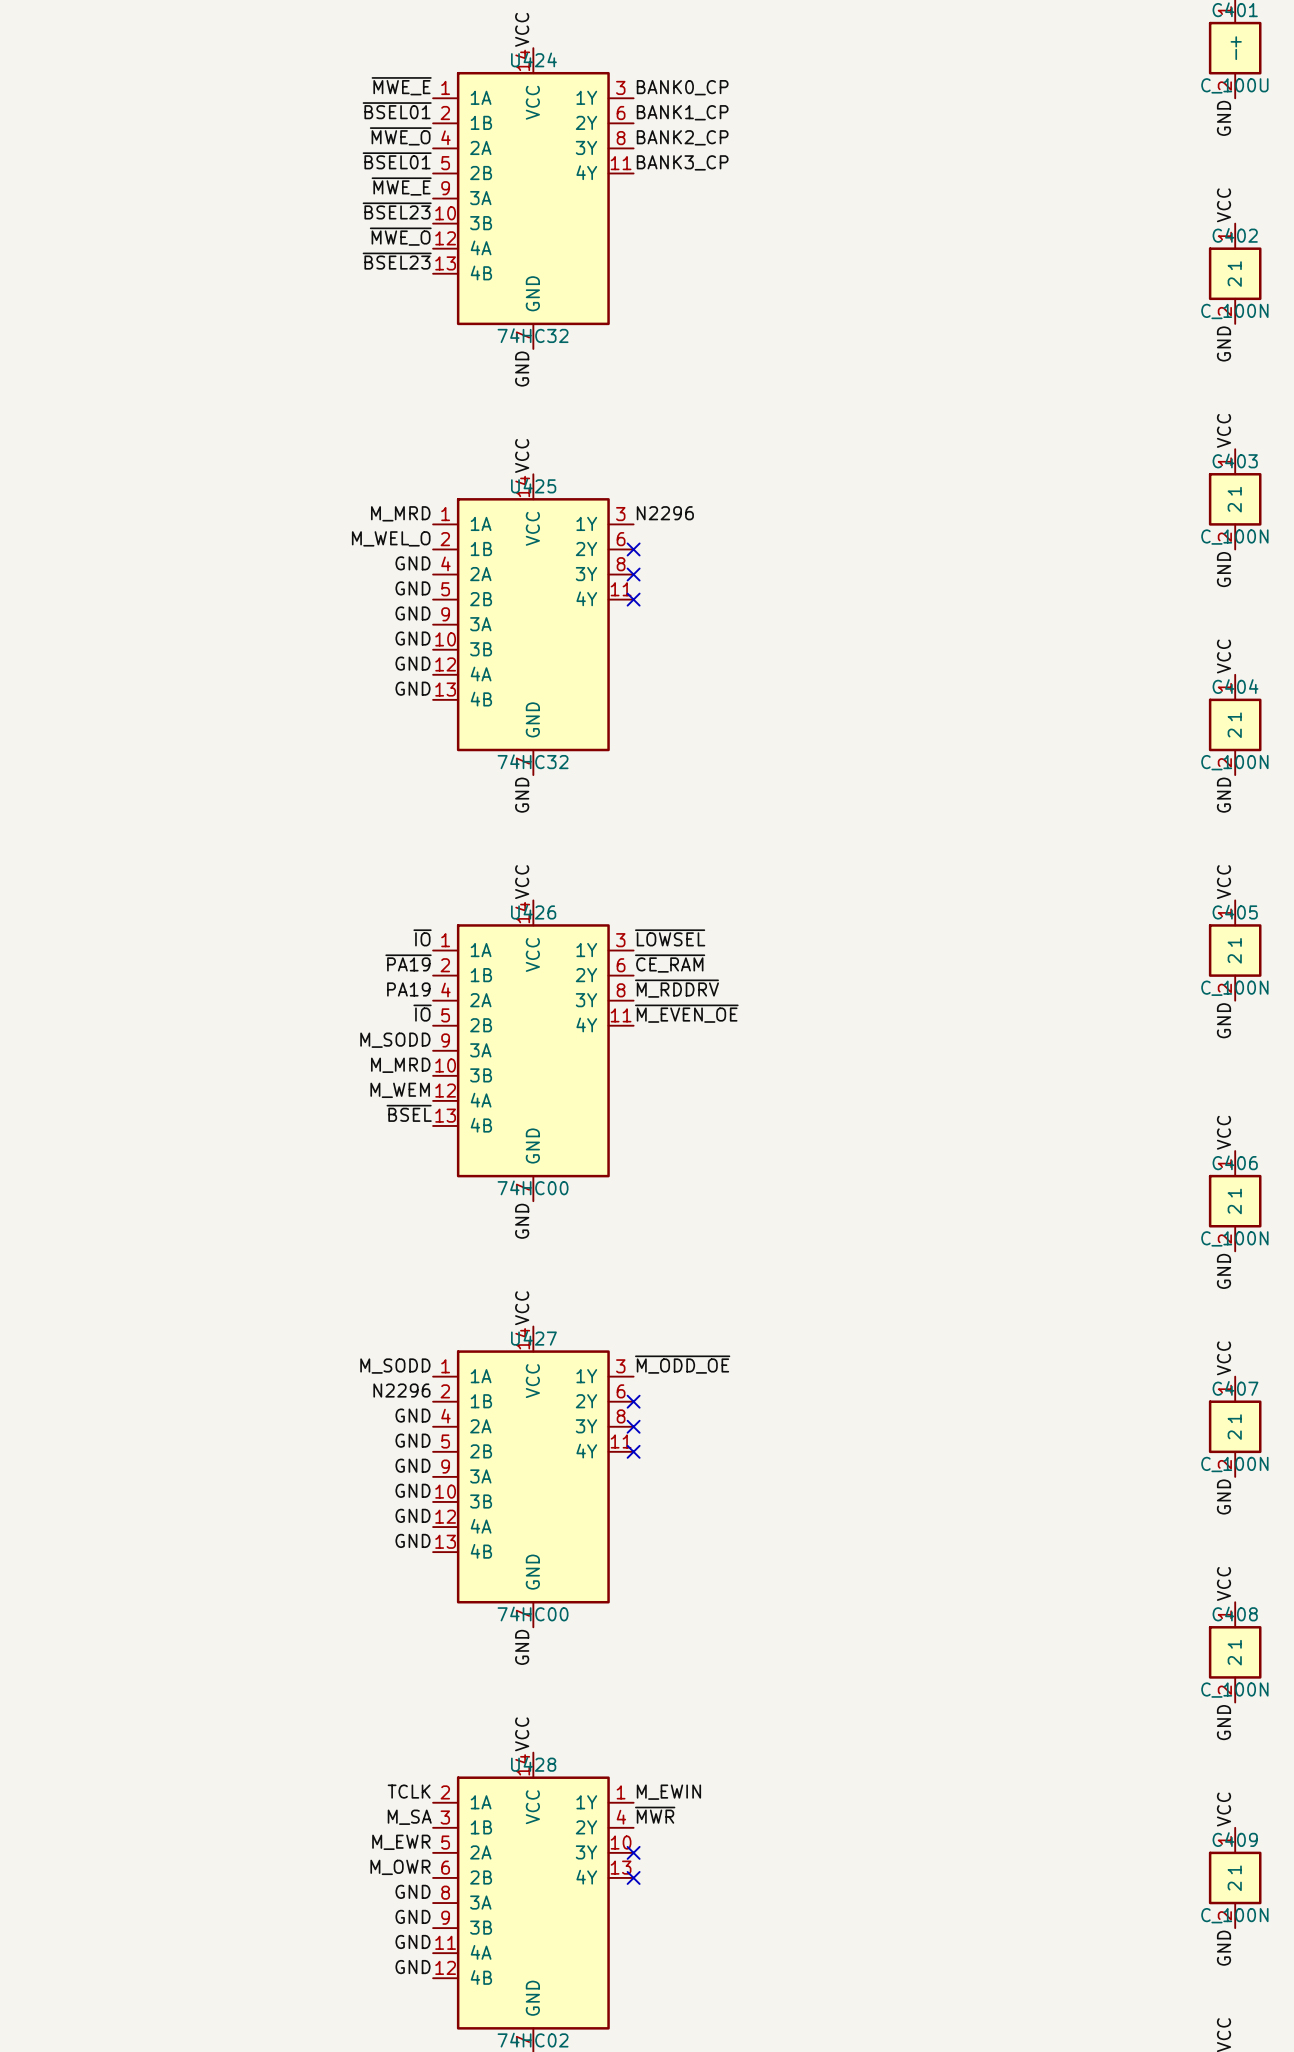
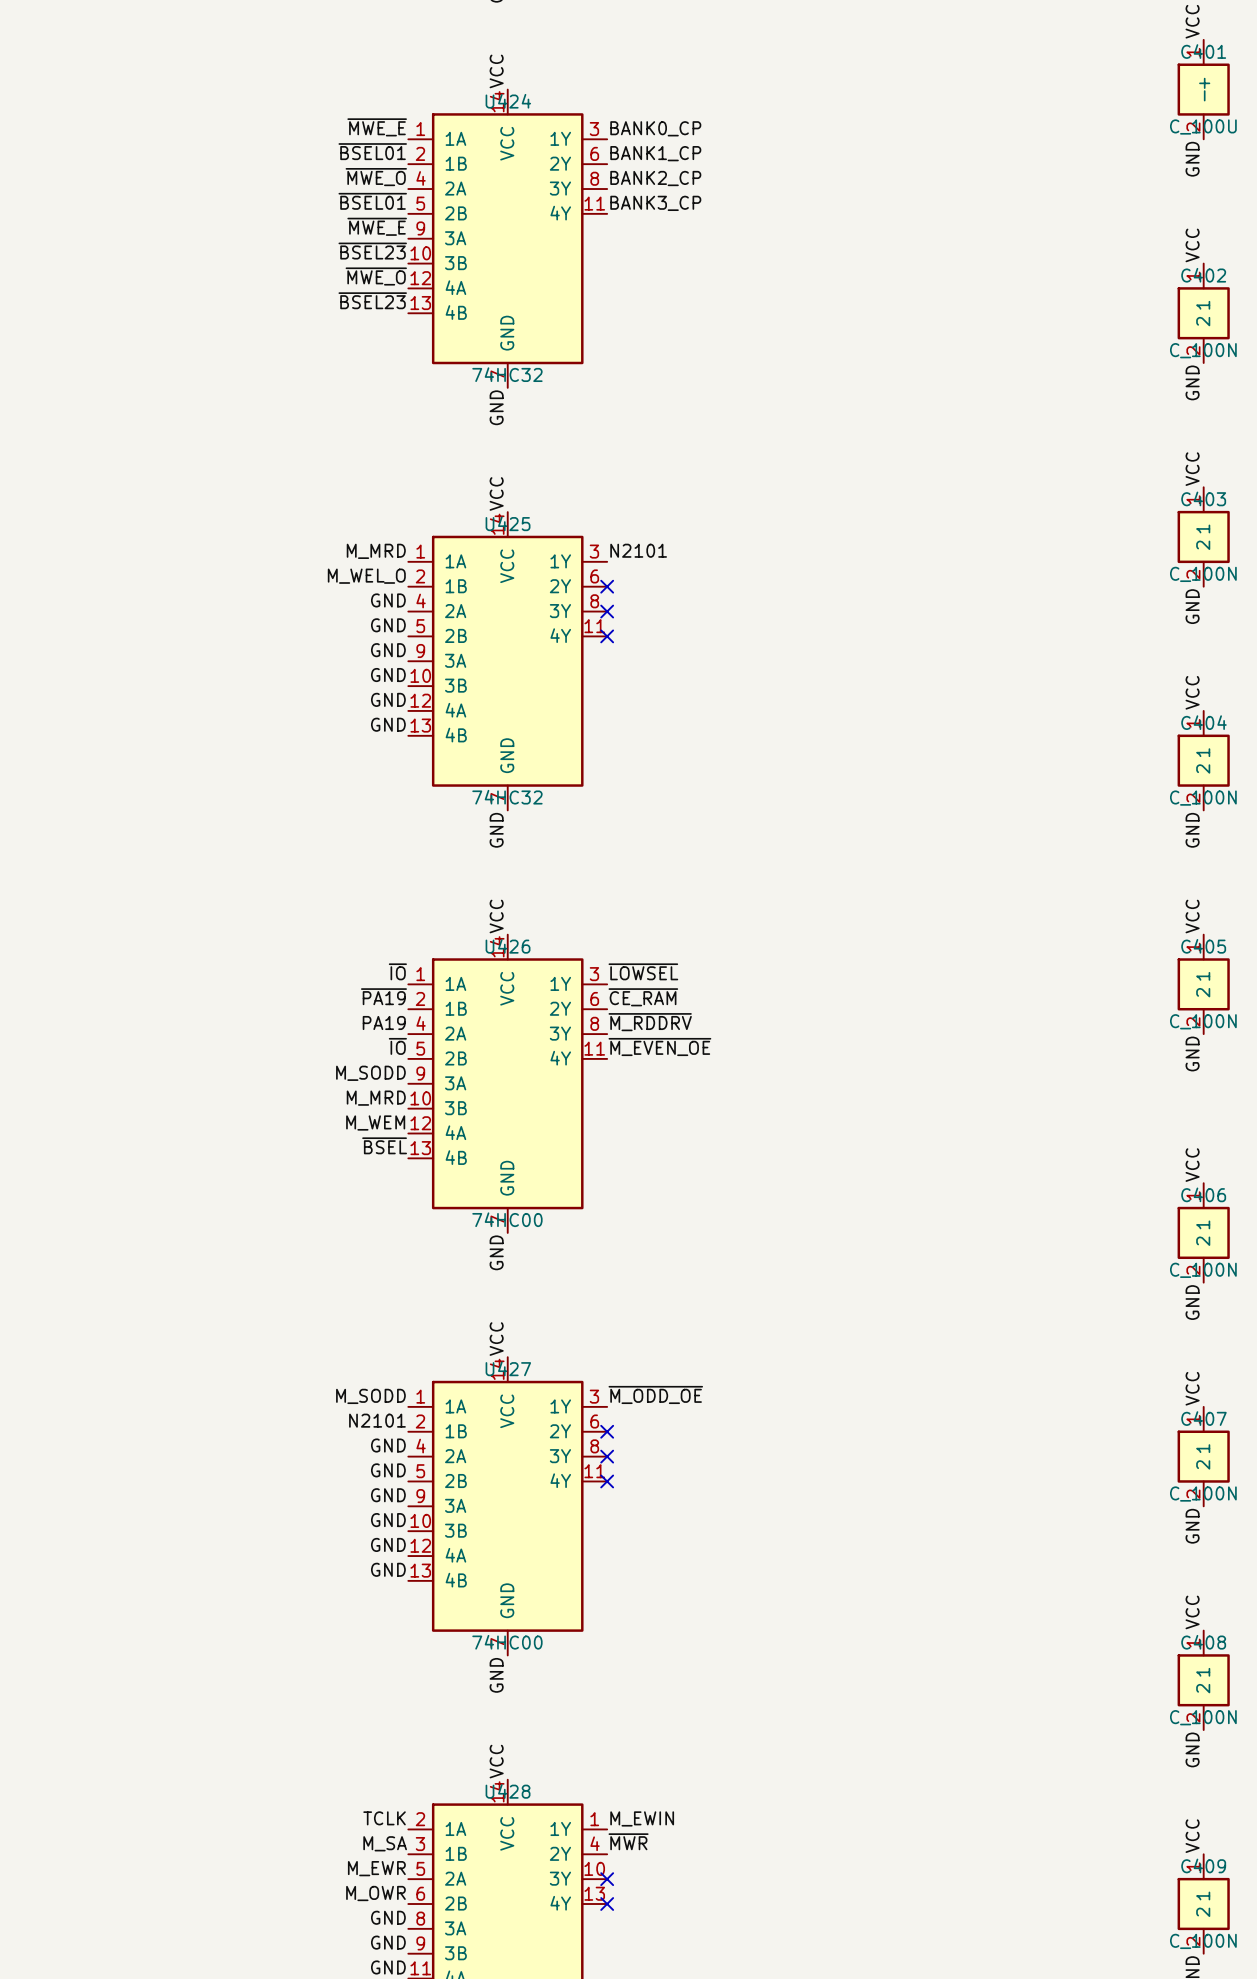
label: N2296 (665, 513) -> N2101 (638, 550)
label: N2296 (401, 1390) -> N2101 (377, 1420)

